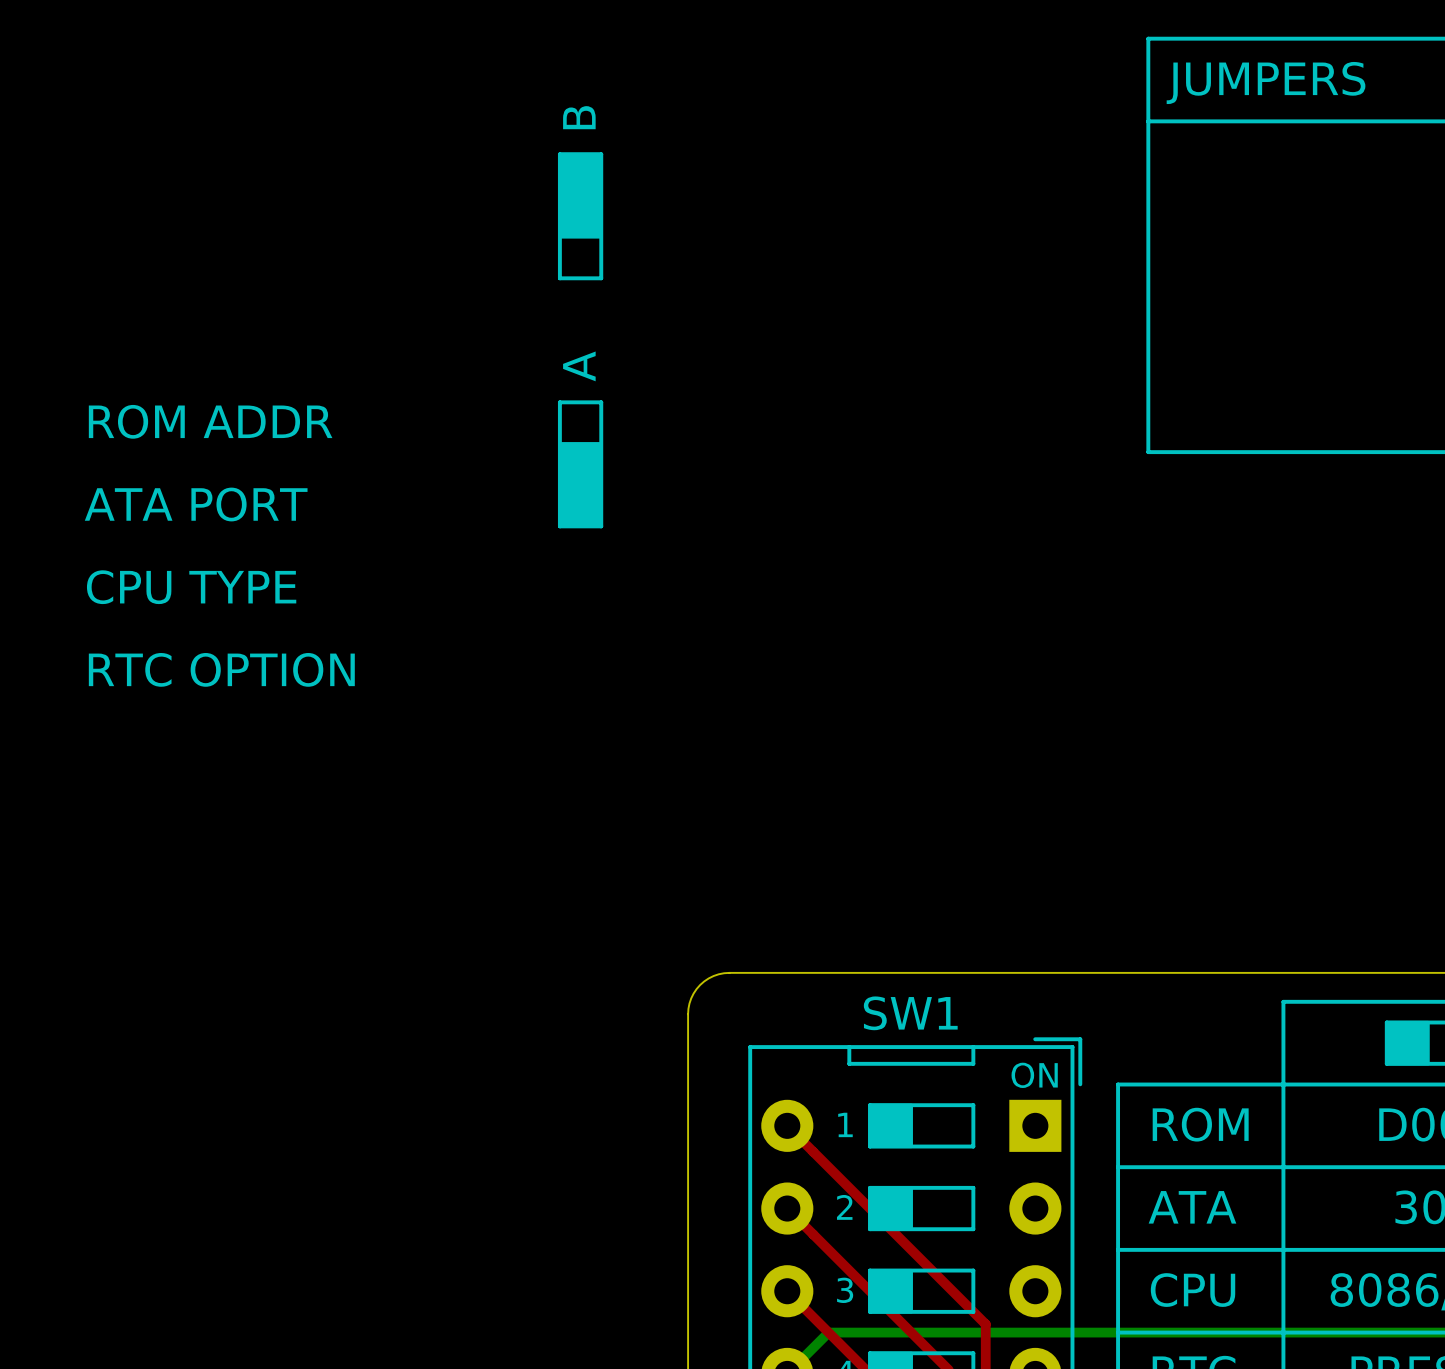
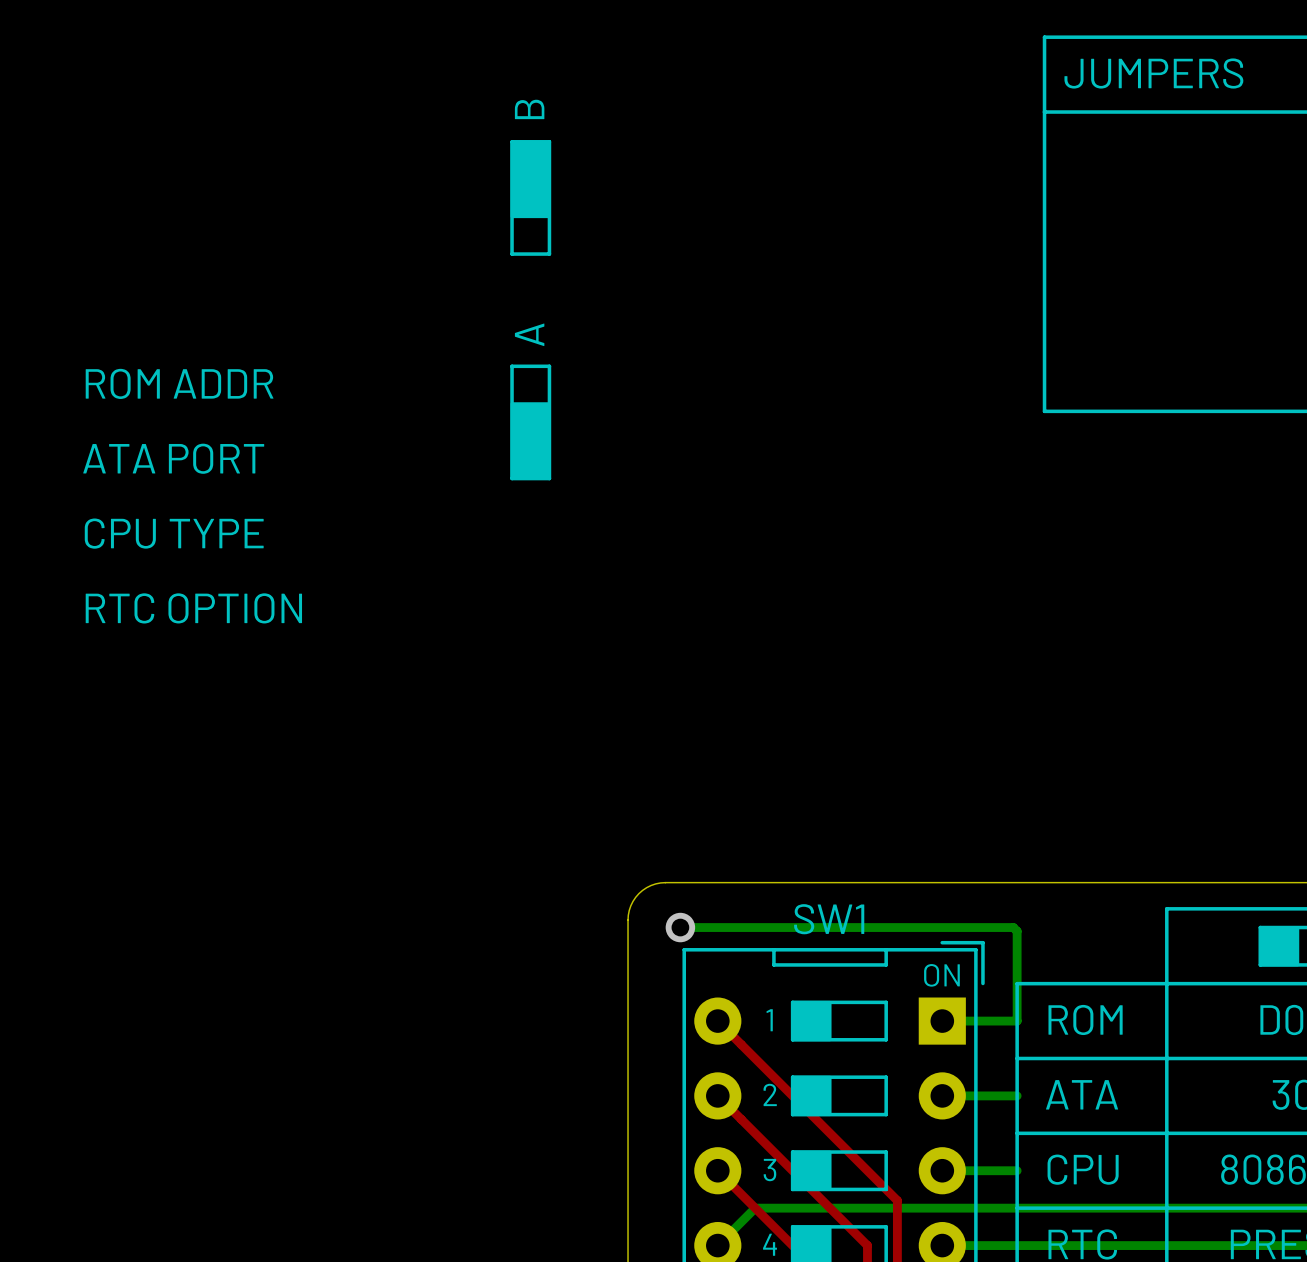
bottom track: none -> (680, 927) (1013, 927) (1017, 931) (1017, 1021) (942, 1021)
via: none -> (680, 927)
bottom track: none -> (942, 1095) (1017, 1095)
bottom track: none -> (942, 1170) (1017, 1170)

